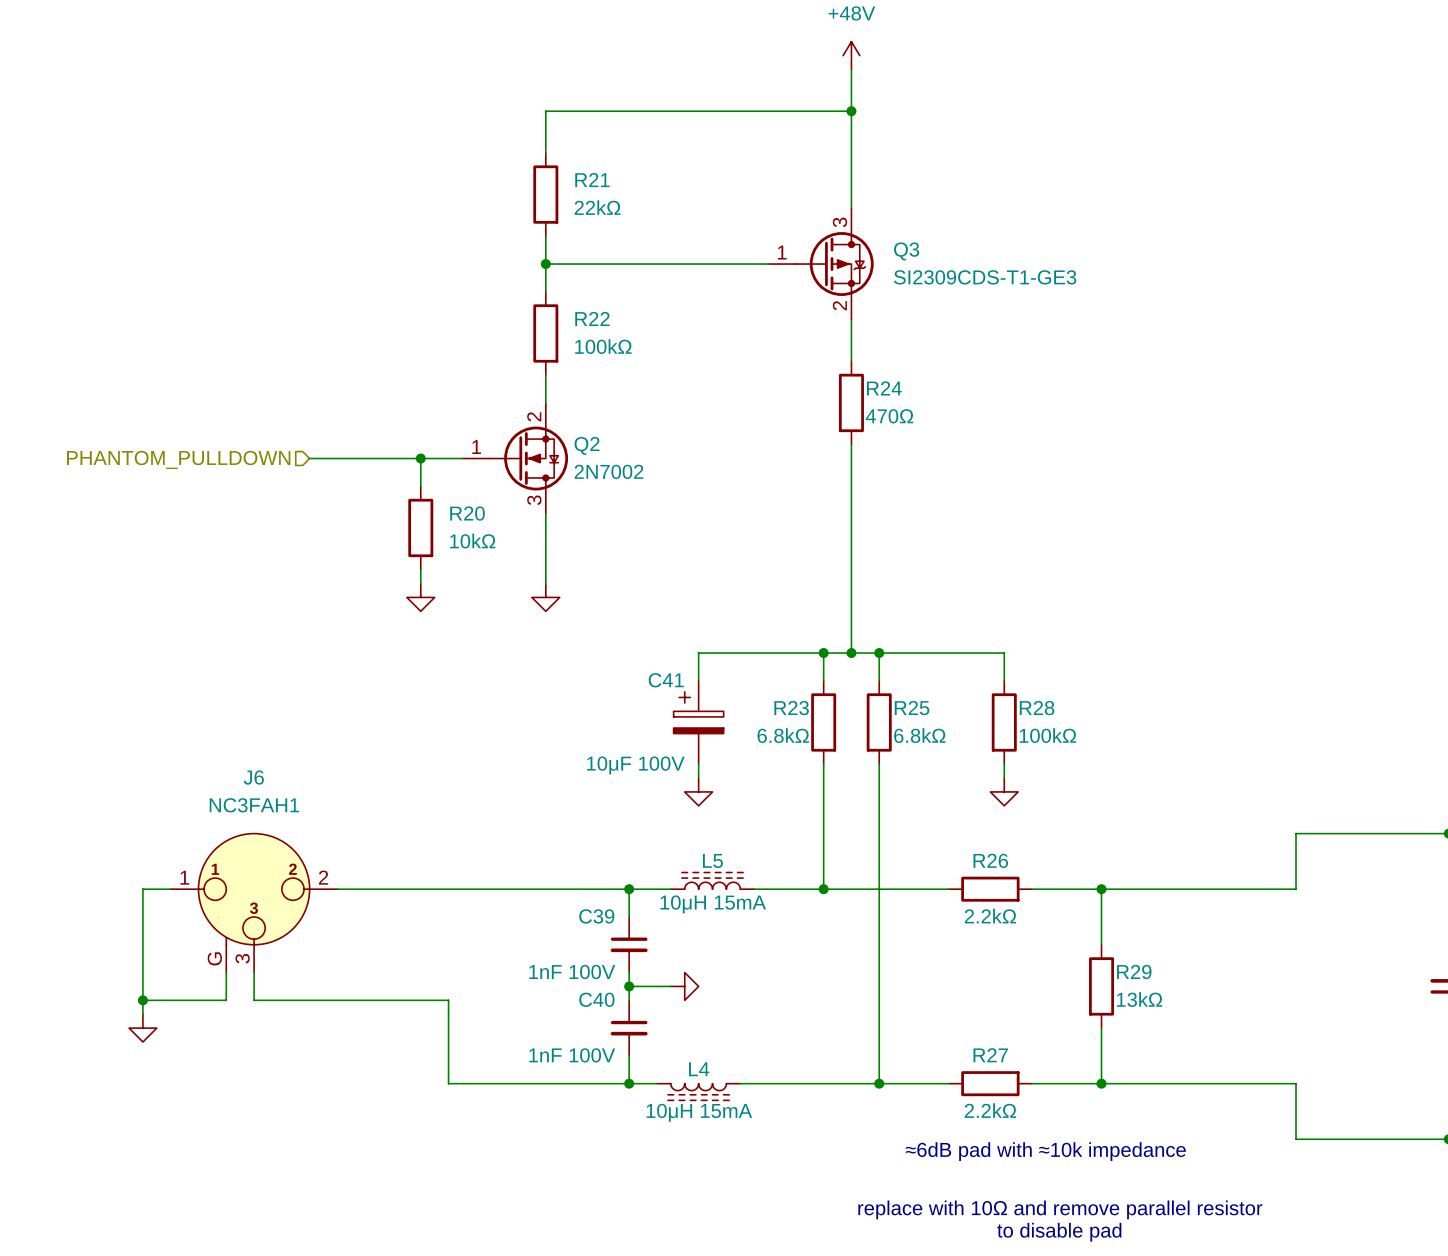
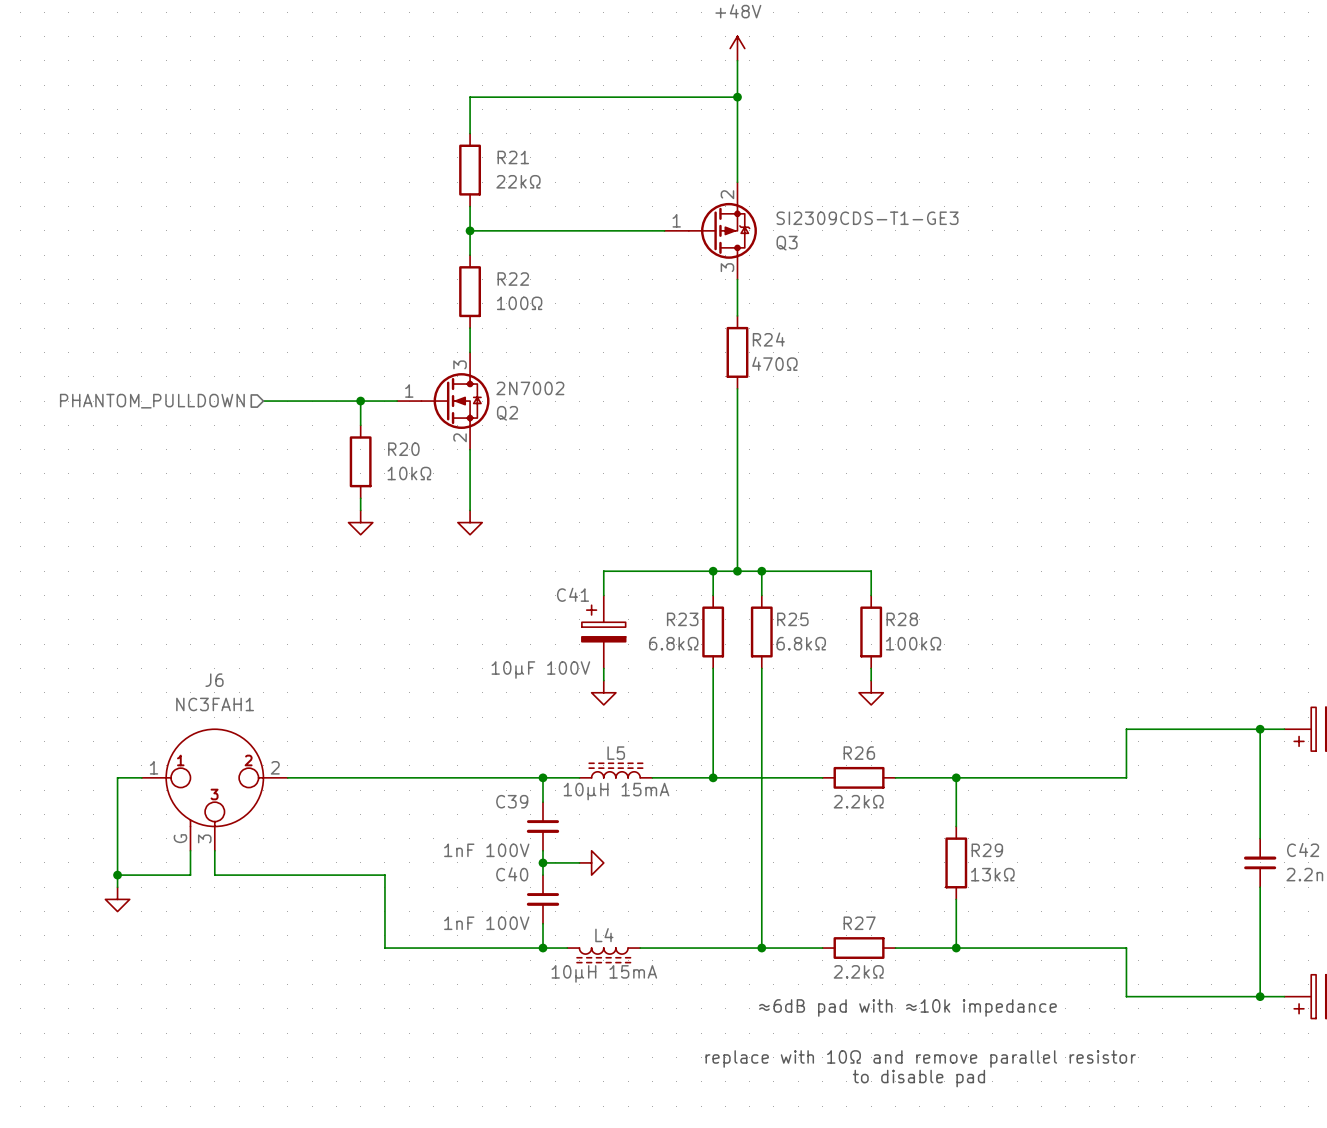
Q3 flip: as is (834, 264) -> up-down (722, 230)
R22 value: 100kΩ (603, 346) -> 100Ω (519, 303)
Q2 flip: as is (529, 458) -> up-down (455, 401)

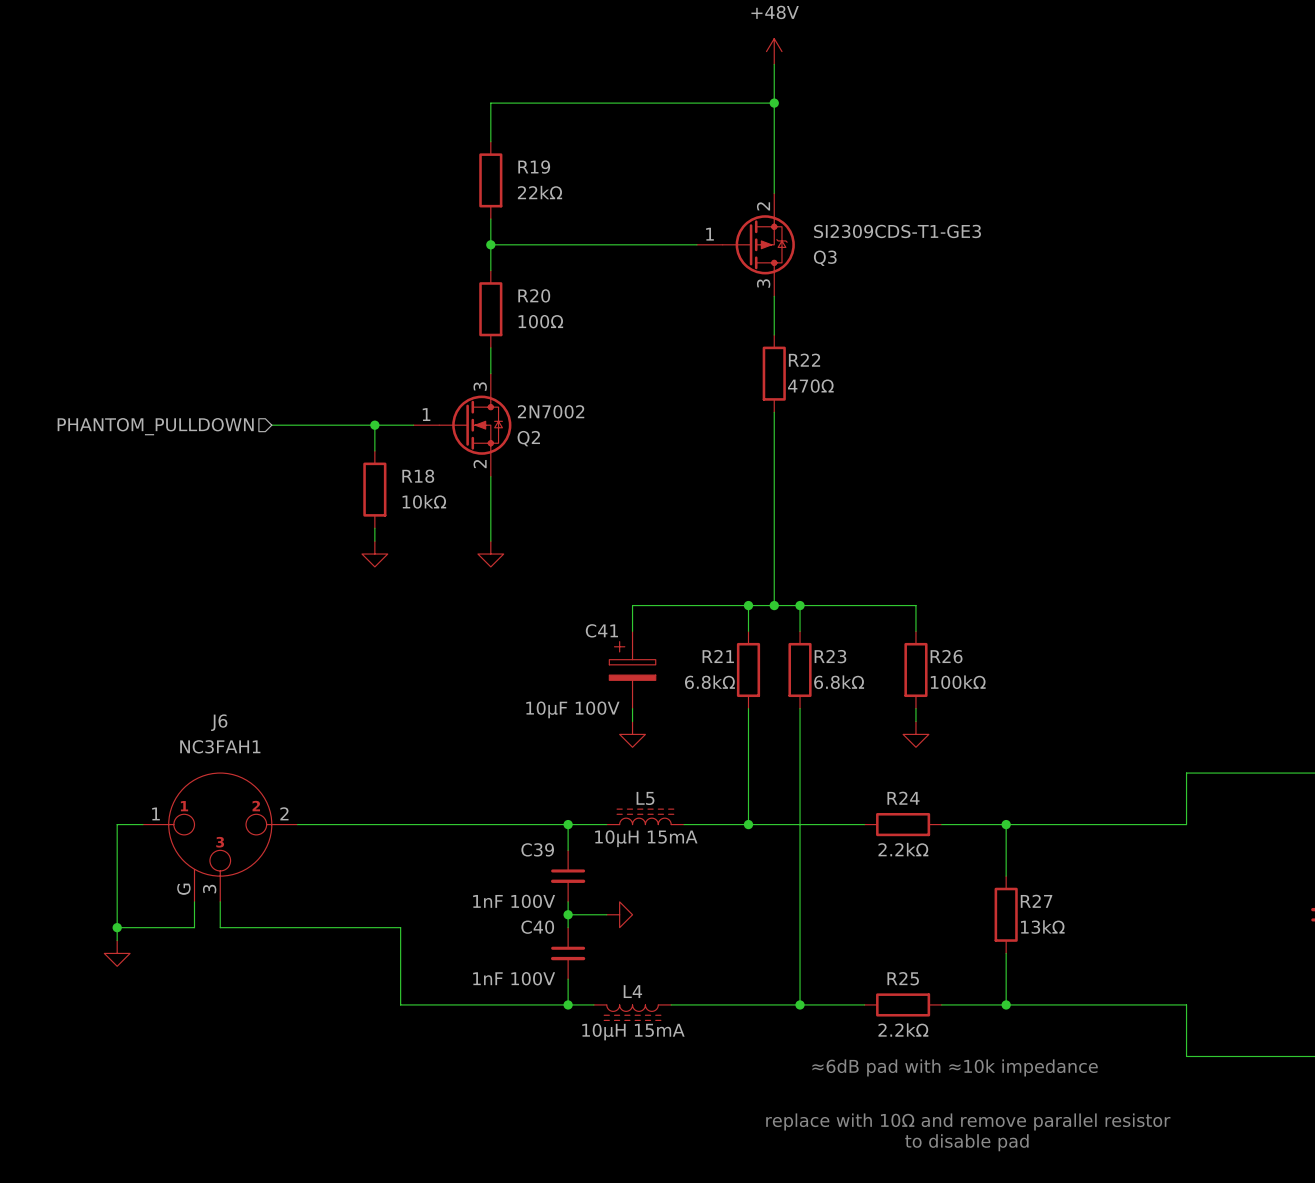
R21 name: R21 (513, 157) -> R19 (534, 167)
R22 name: R22 (513, 279) -> R20 (534, 295)
R24 name: R24 (768, 339) -> R22 (804, 360)
R20 name: R20 (403, 449) -> R18 (418, 476)
R23 name: R23 (682, 619) -> R21 (718, 656)
R25 name: R25 (792, 619) -> R23 (830, 656)
R28 name: R28 (902, 619) -> R26 (946, 656)
R26 name: R26 (859, 753) -> R24 (903, 798)
R29 name: R29 (987, 850) -> R27 (1036, 901)
R27 name: R27 (859, 923) -> R25 (903, 978)

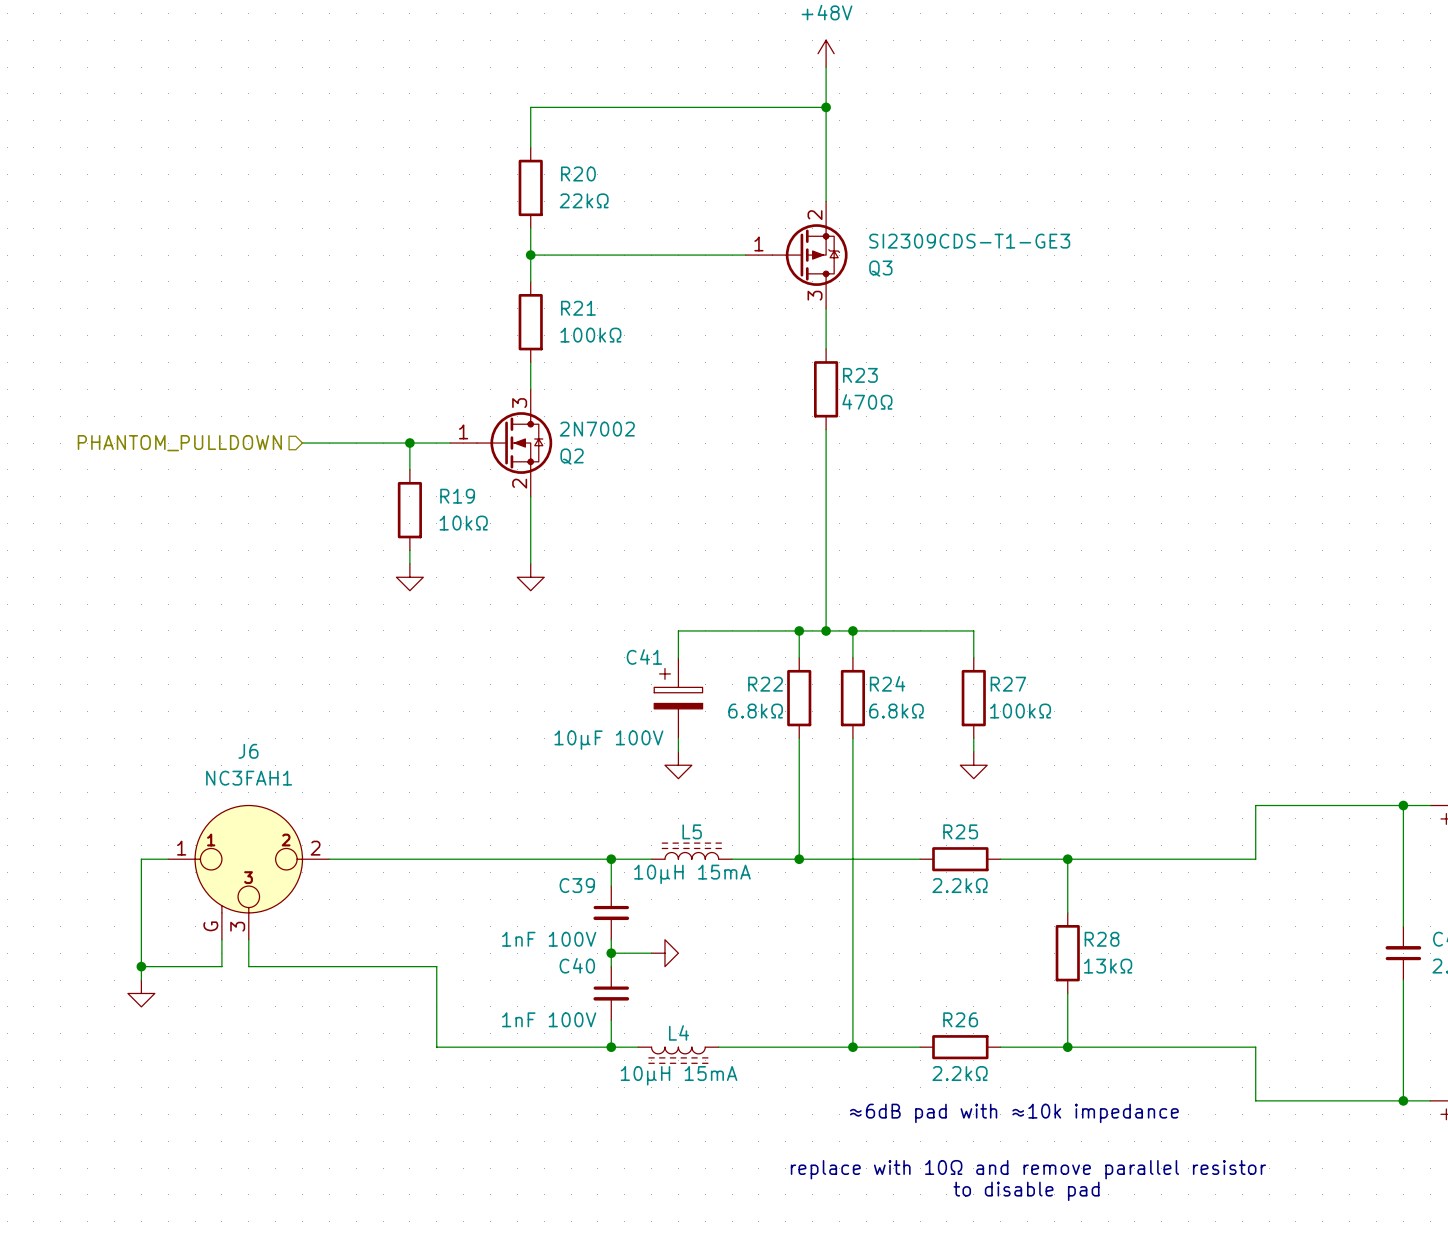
R19 name: R19 (534, 167) -> R20 (578, 174)
R20 name: R20 (534, 295) -> R21 (578, 308)
R20 value: 100Ω (540, 321) -> 100kΩ (590, 335)
R22 name: R22 (804, 360) -> R23 (860, 375)
R18 name: R18 (418, 476) -> R19 (457, 496)
R21 name: R21 (718, 656) -> R22 (765, 684)
R23 name: R23 (830, 656) -> R24 (887, 683)
R26 name: R26 (946, 656) -> R27 (1008, 684)
R24 name: R24 (903, 798) -> R25 (960, 831)
R27 name: R27 (1036, 901) -> R28 (1102, 939)
R25 name: R25 (903, 978) -> R26 (960, 1019)

